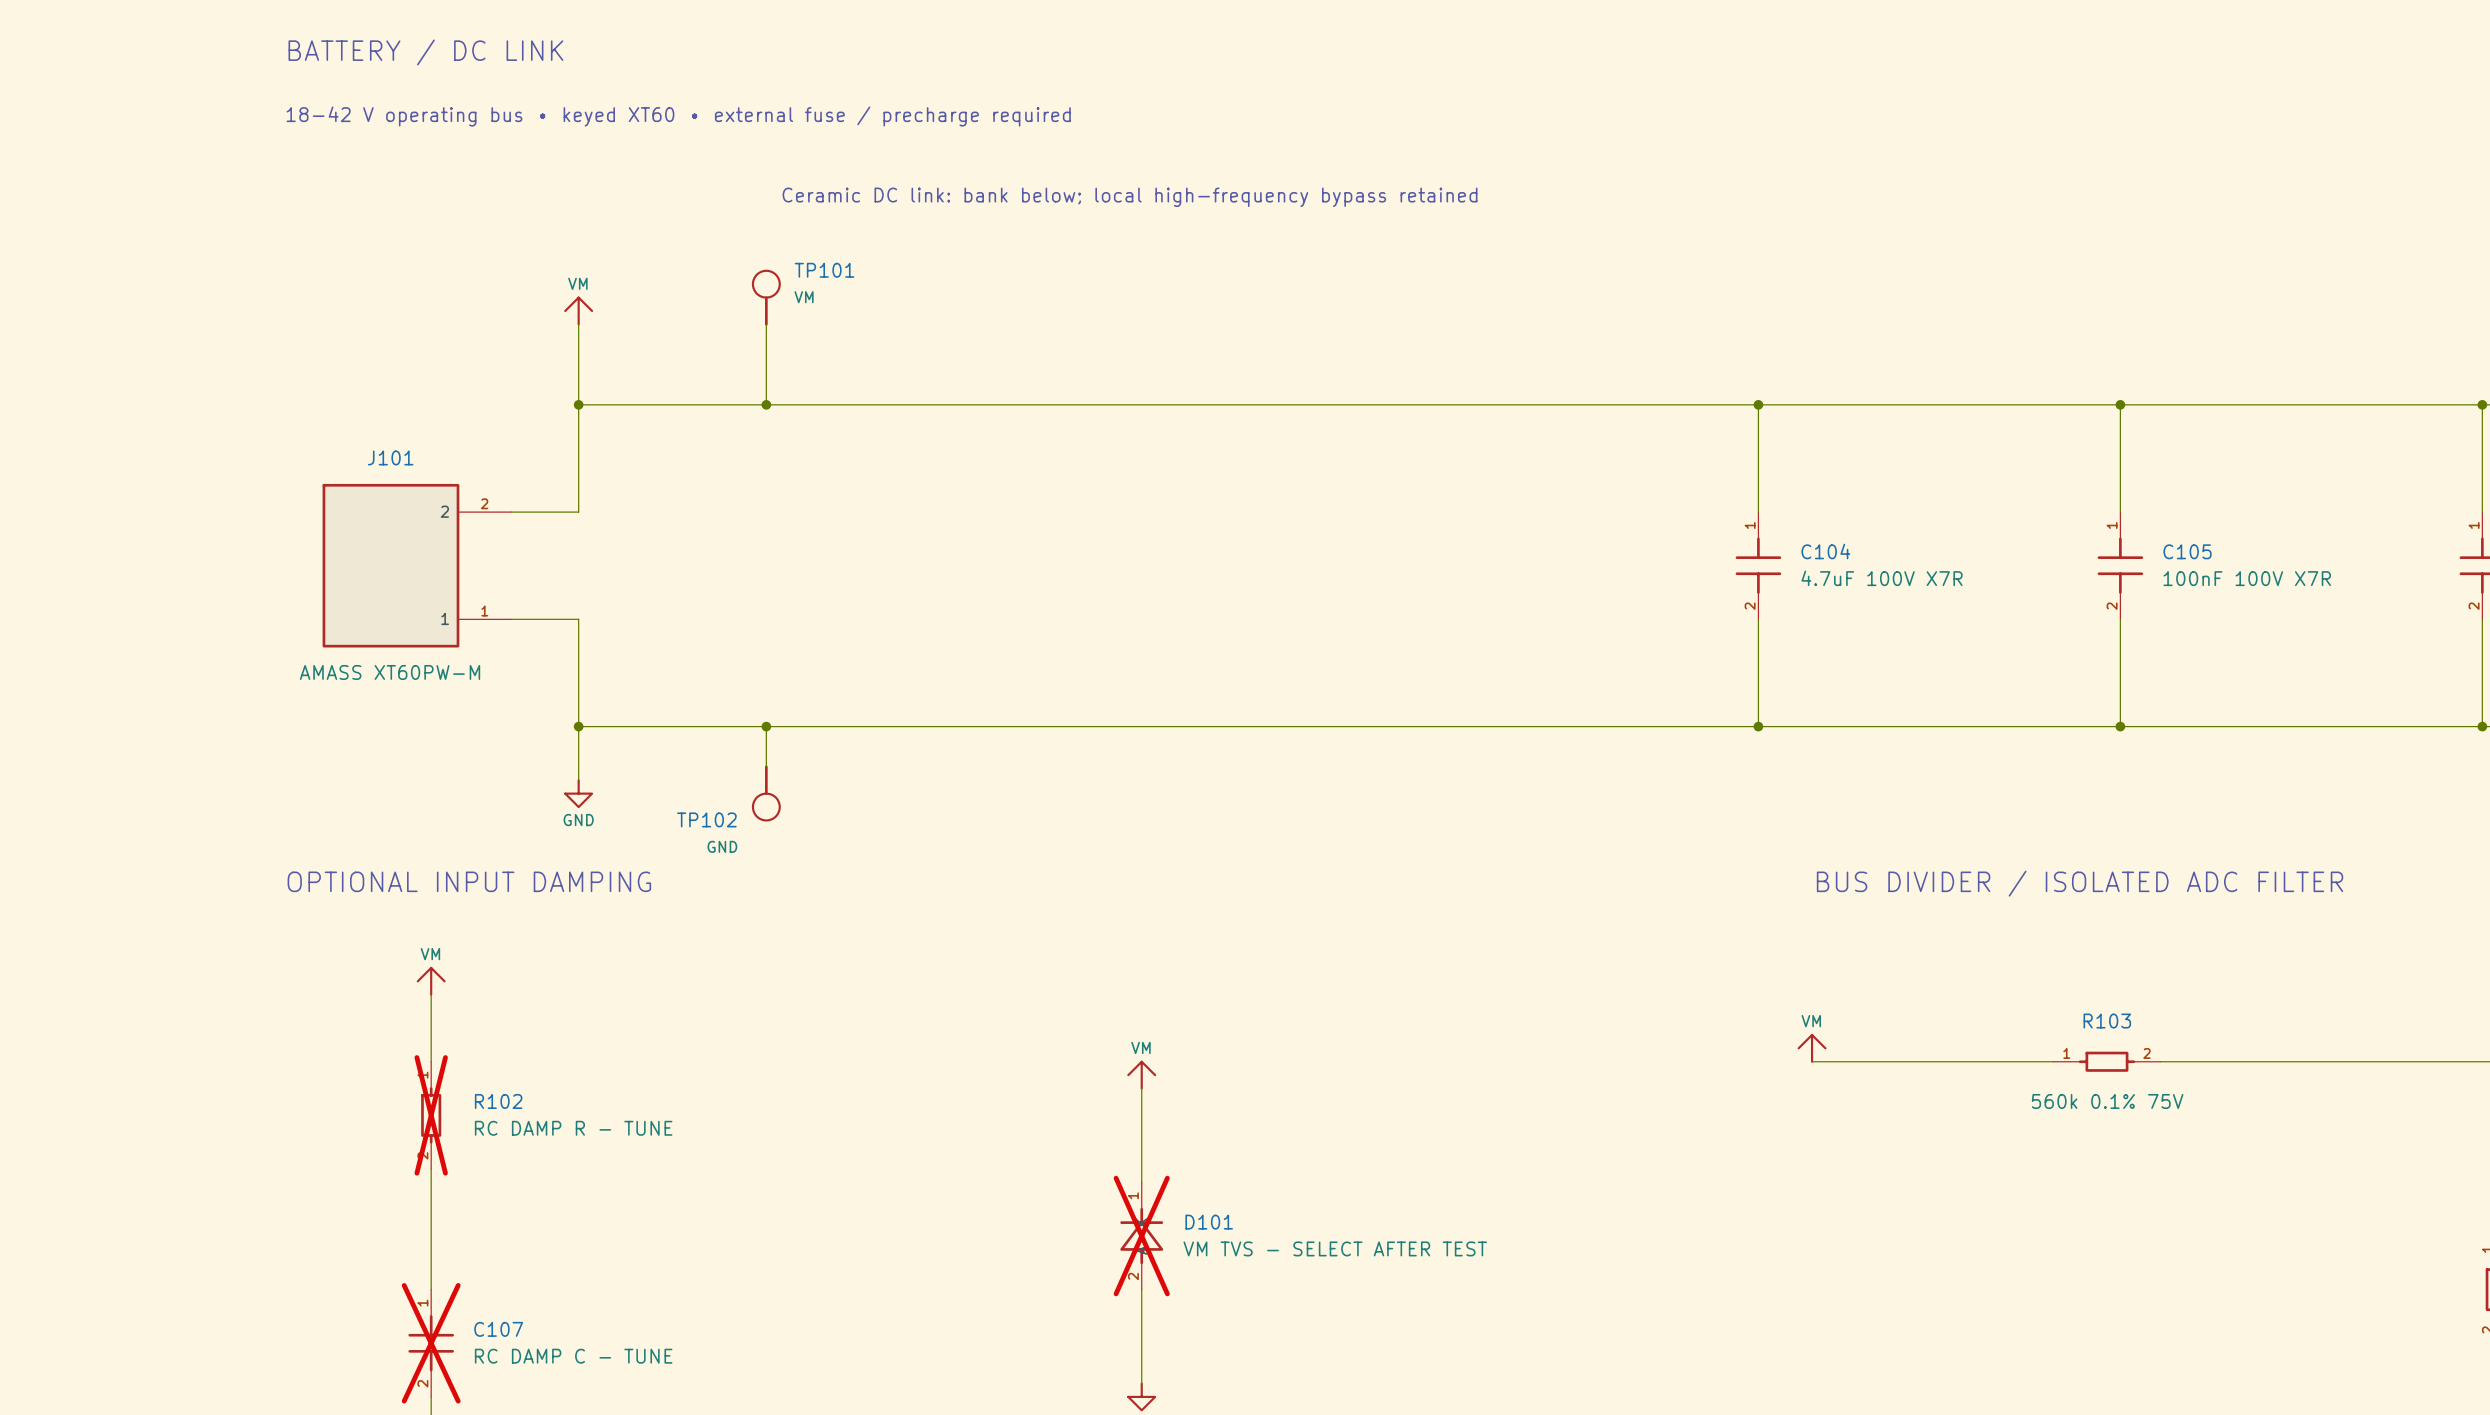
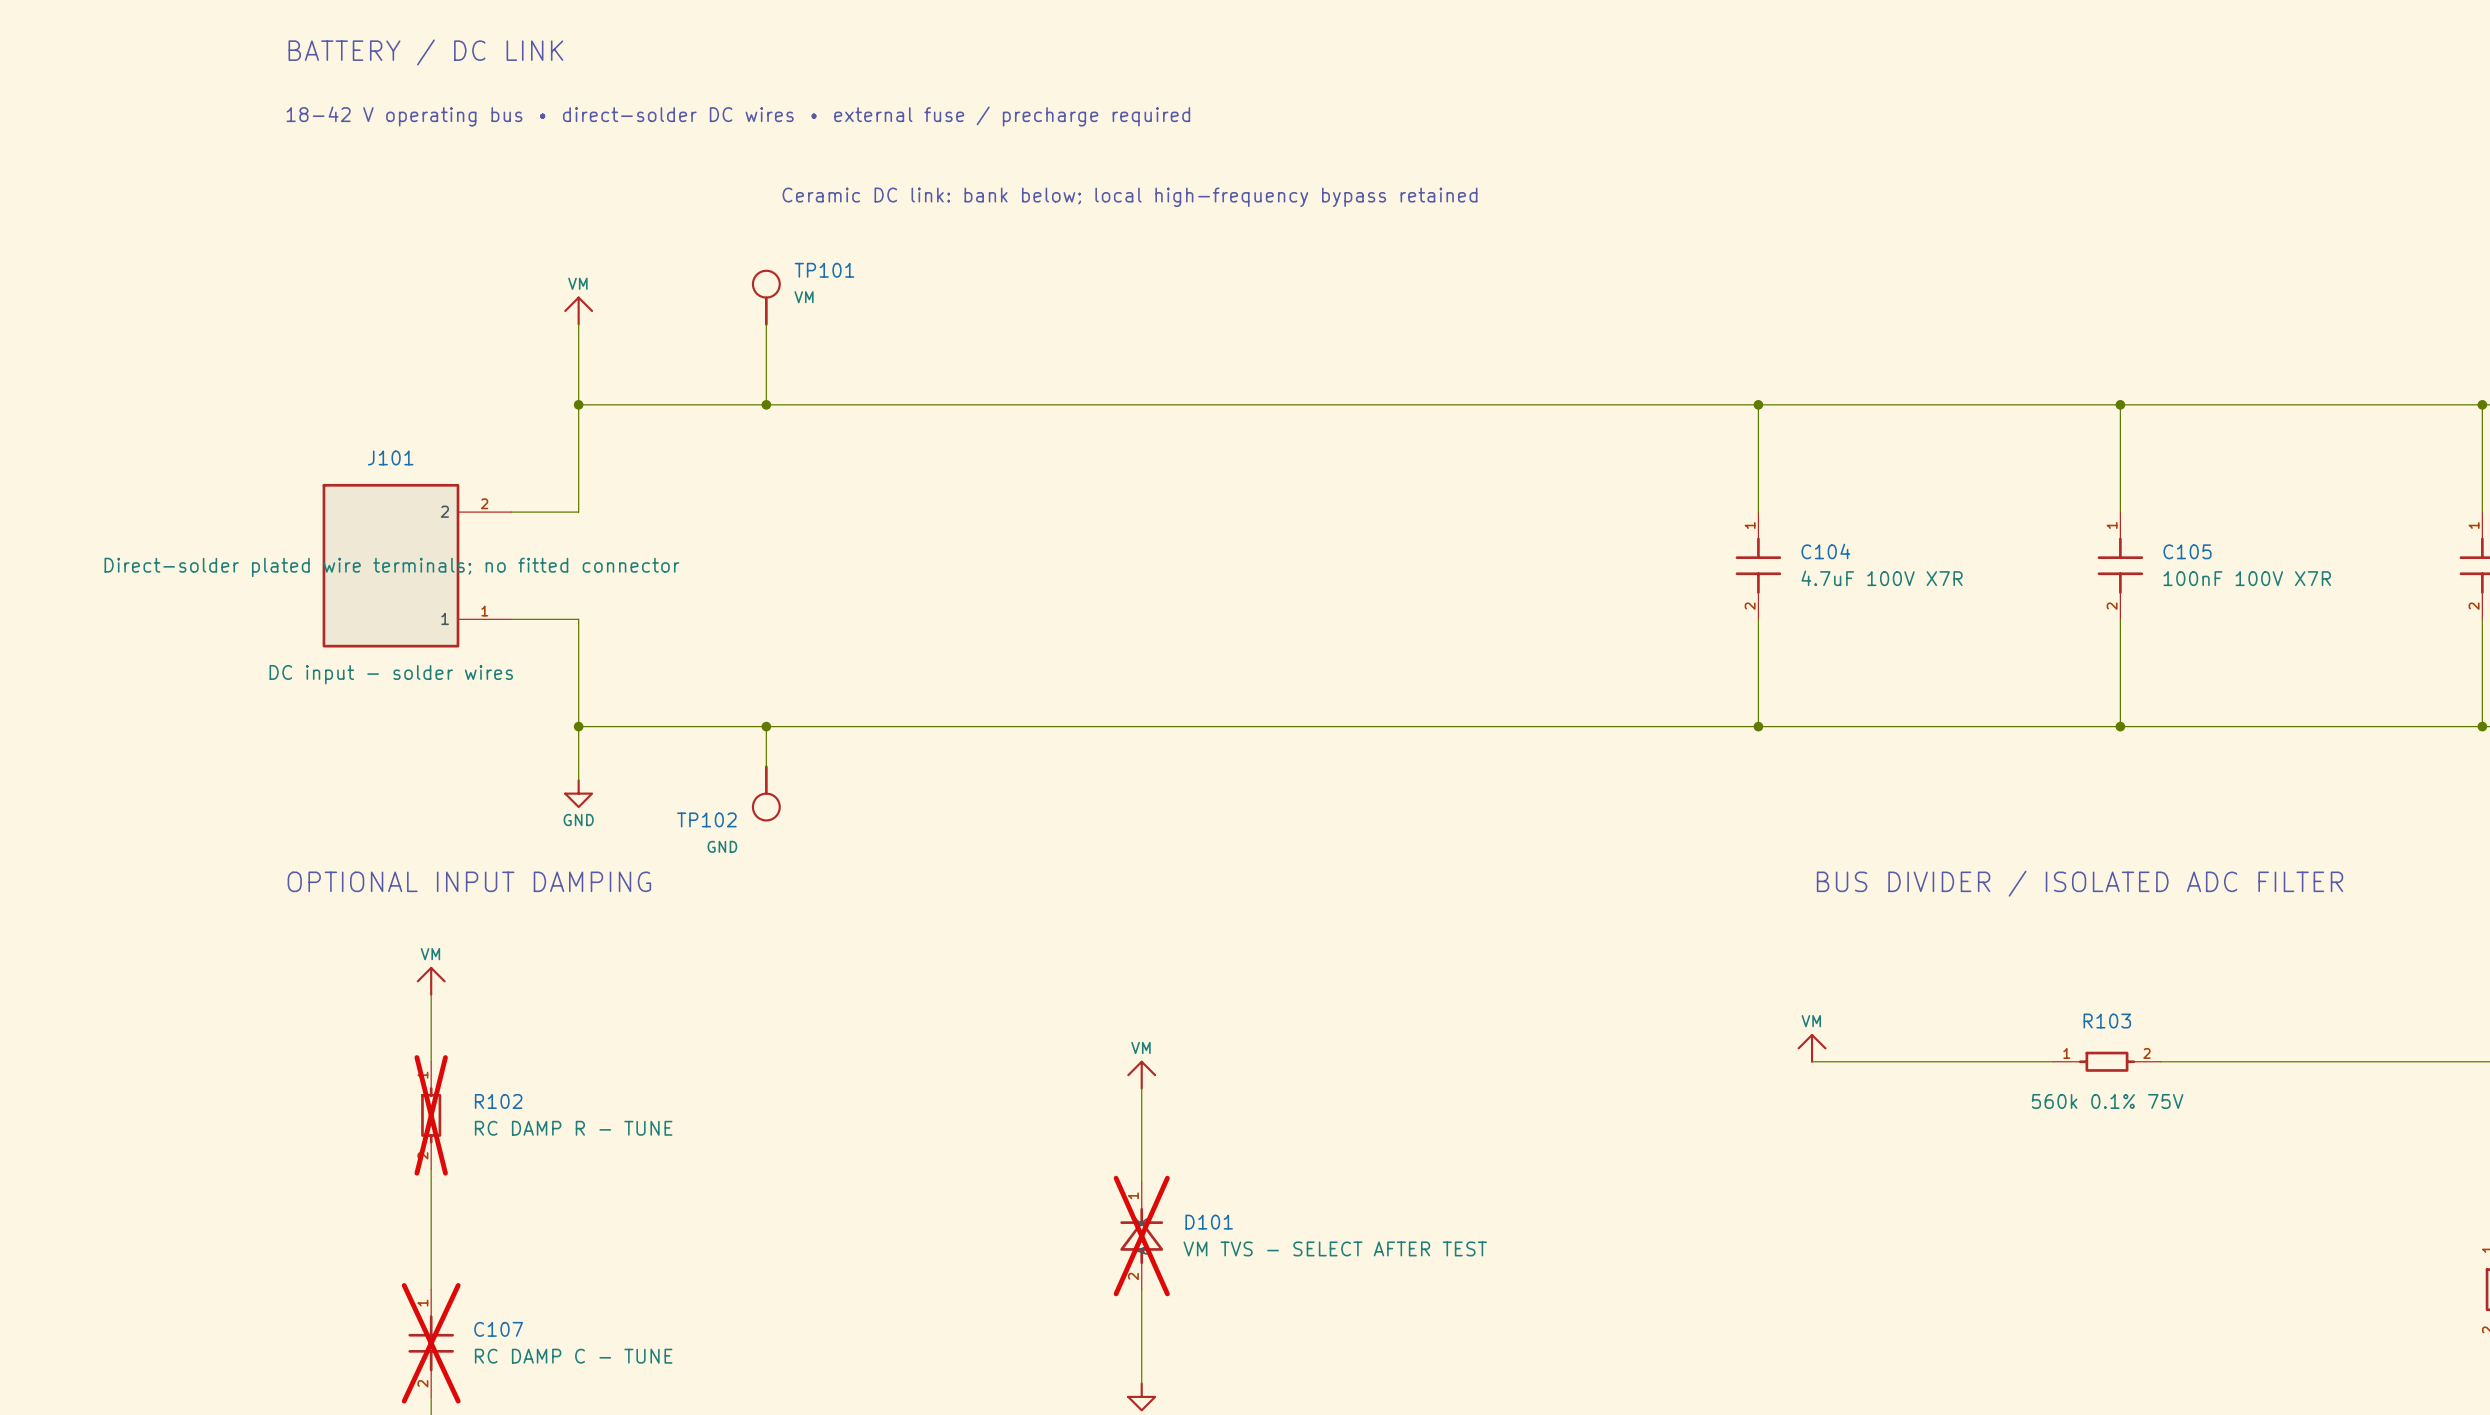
text: 18-42 V operating bus • keyed XT60 • external fuse / precharge required (678, 116) -> 18-42 V operating bus • direct-solder DC wires • external fuse / precharge required (738, 116)
J101 text: none -> Direct-solder plated wire terminals; no fitted connector (391, 567)
J101 value: AMASS XT60PW-M (390, 672) -> DC input - solder wires (391, 674)

